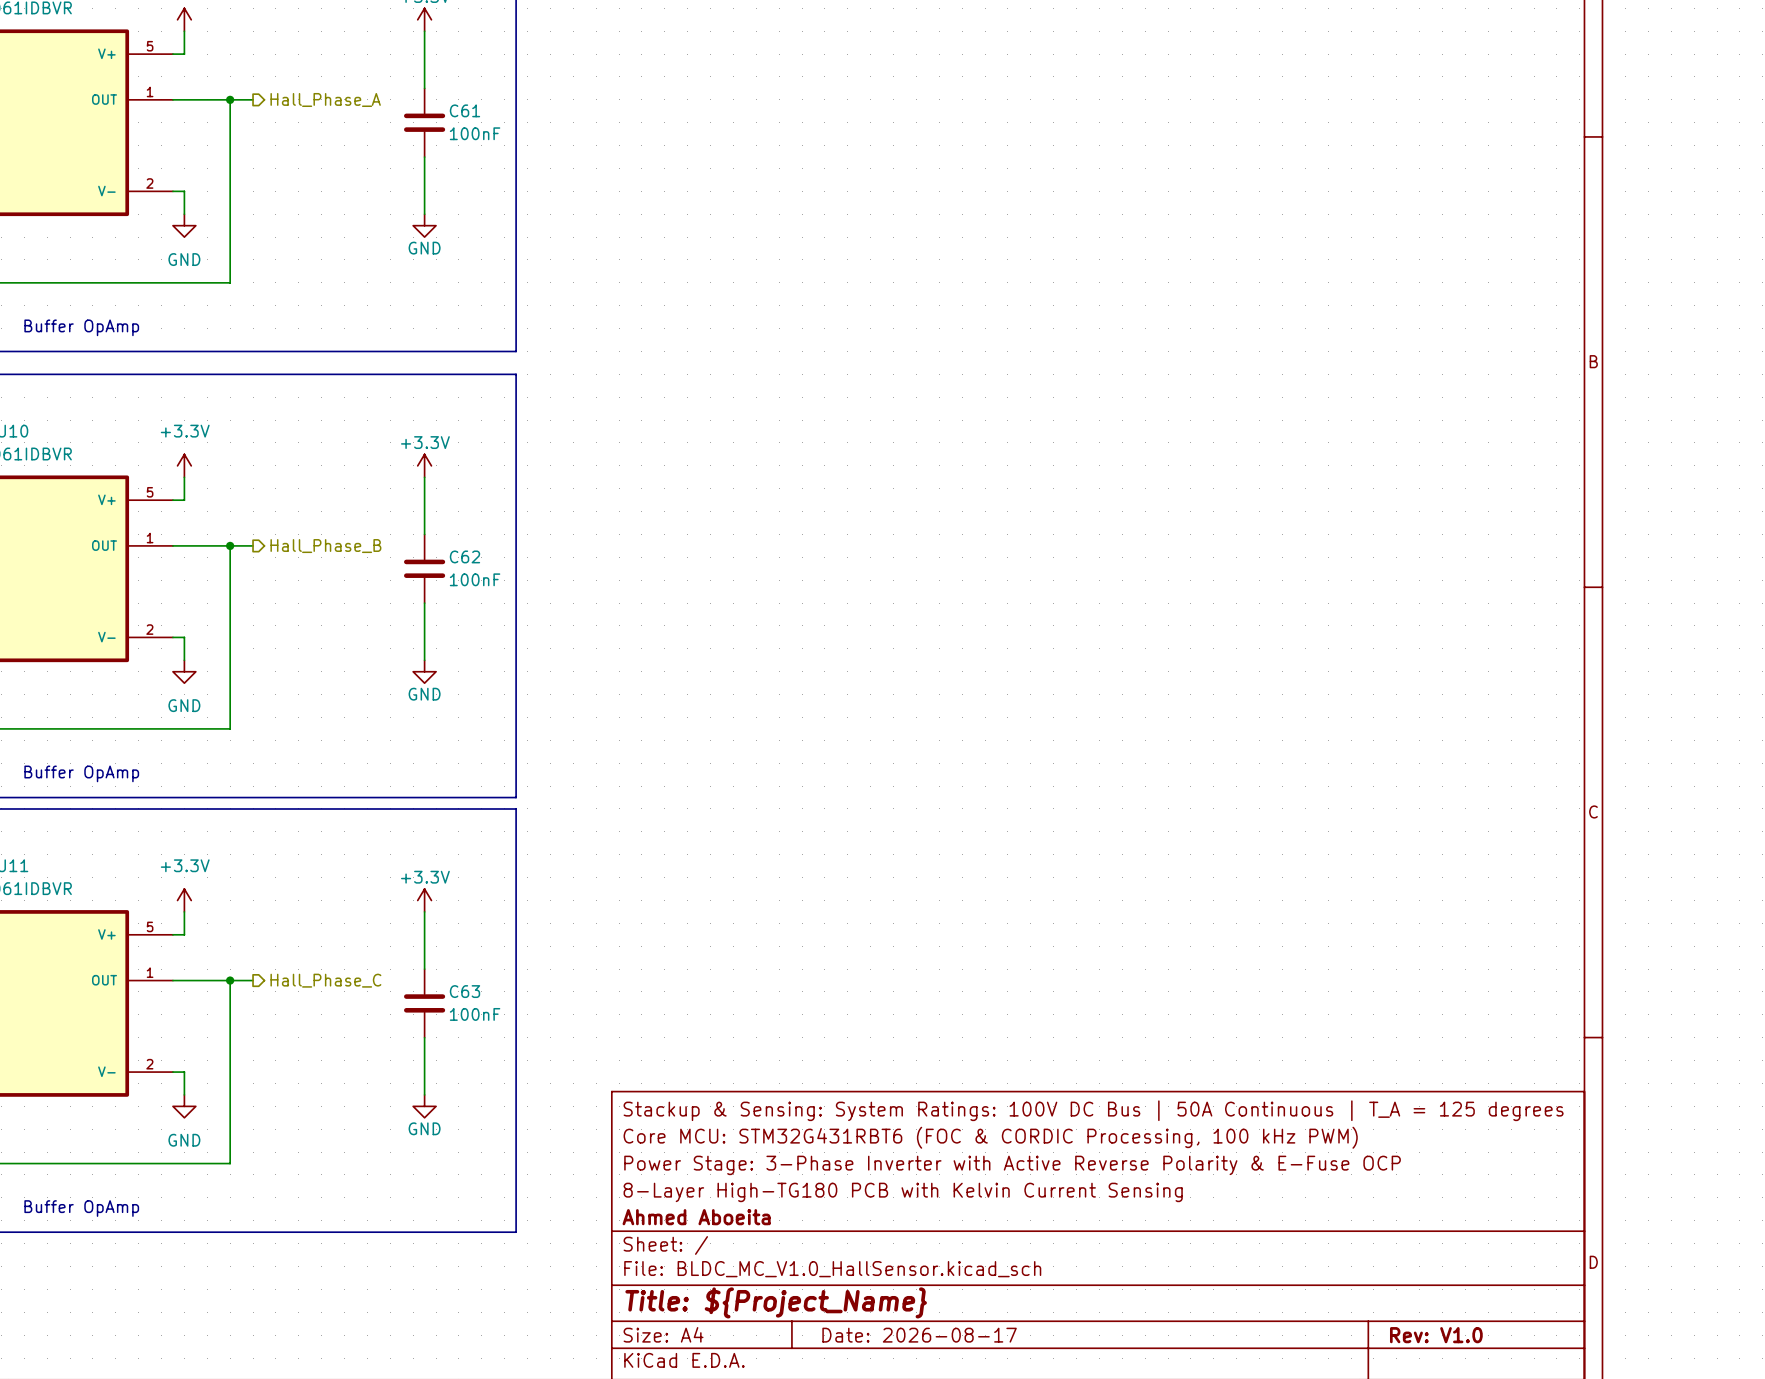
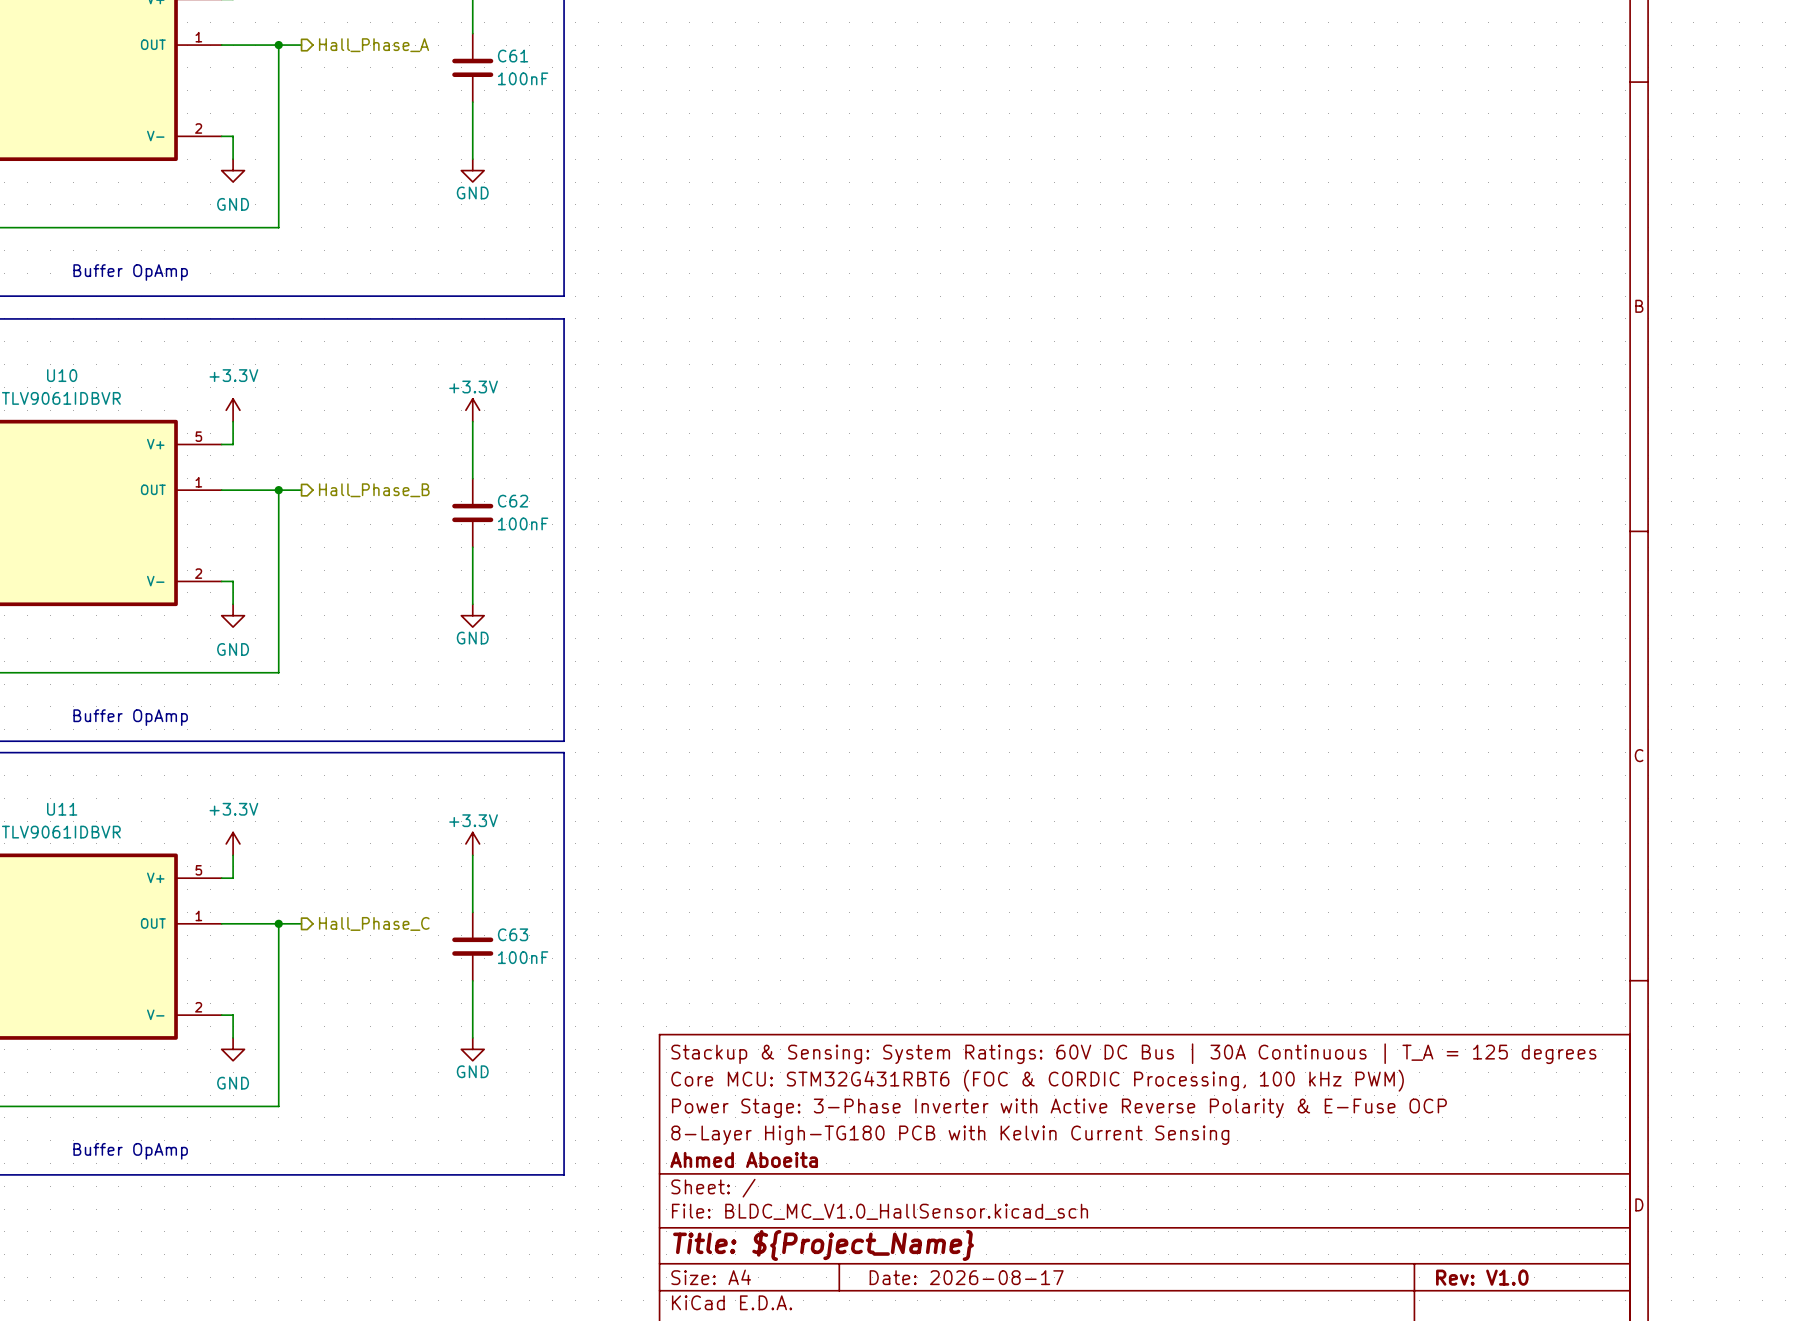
title block: Stackup & Sensing: System Ratings: 100V DC Bus | 50A Continuous | T_A = 125 degrees (1093, 1110) -> Stackup & Sensing: System Ratings: 60V DC Bus | 30A Continuous | T_A = 125 degrees (1133, 1053)

